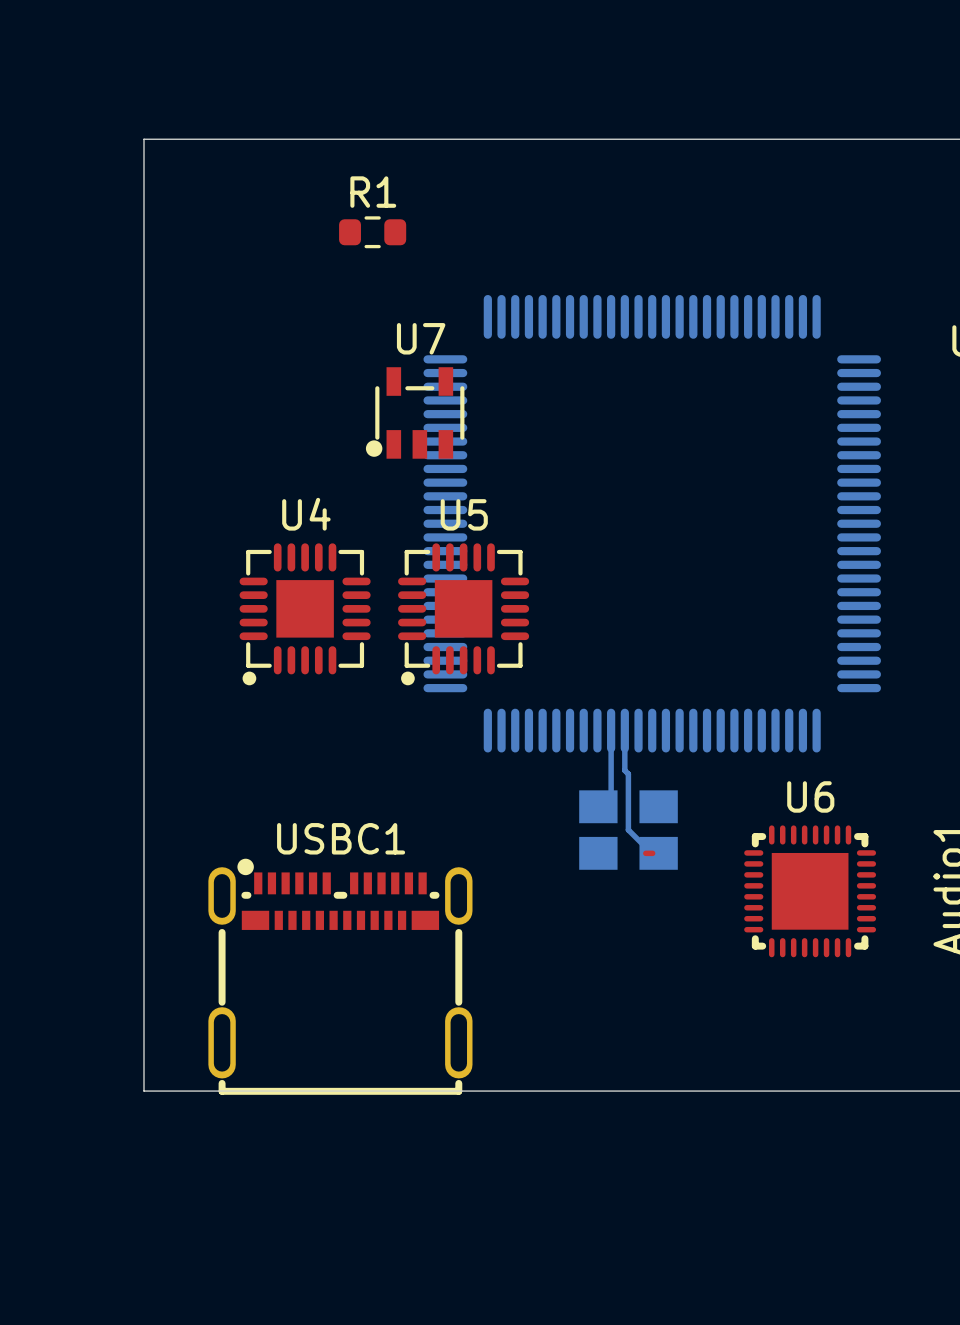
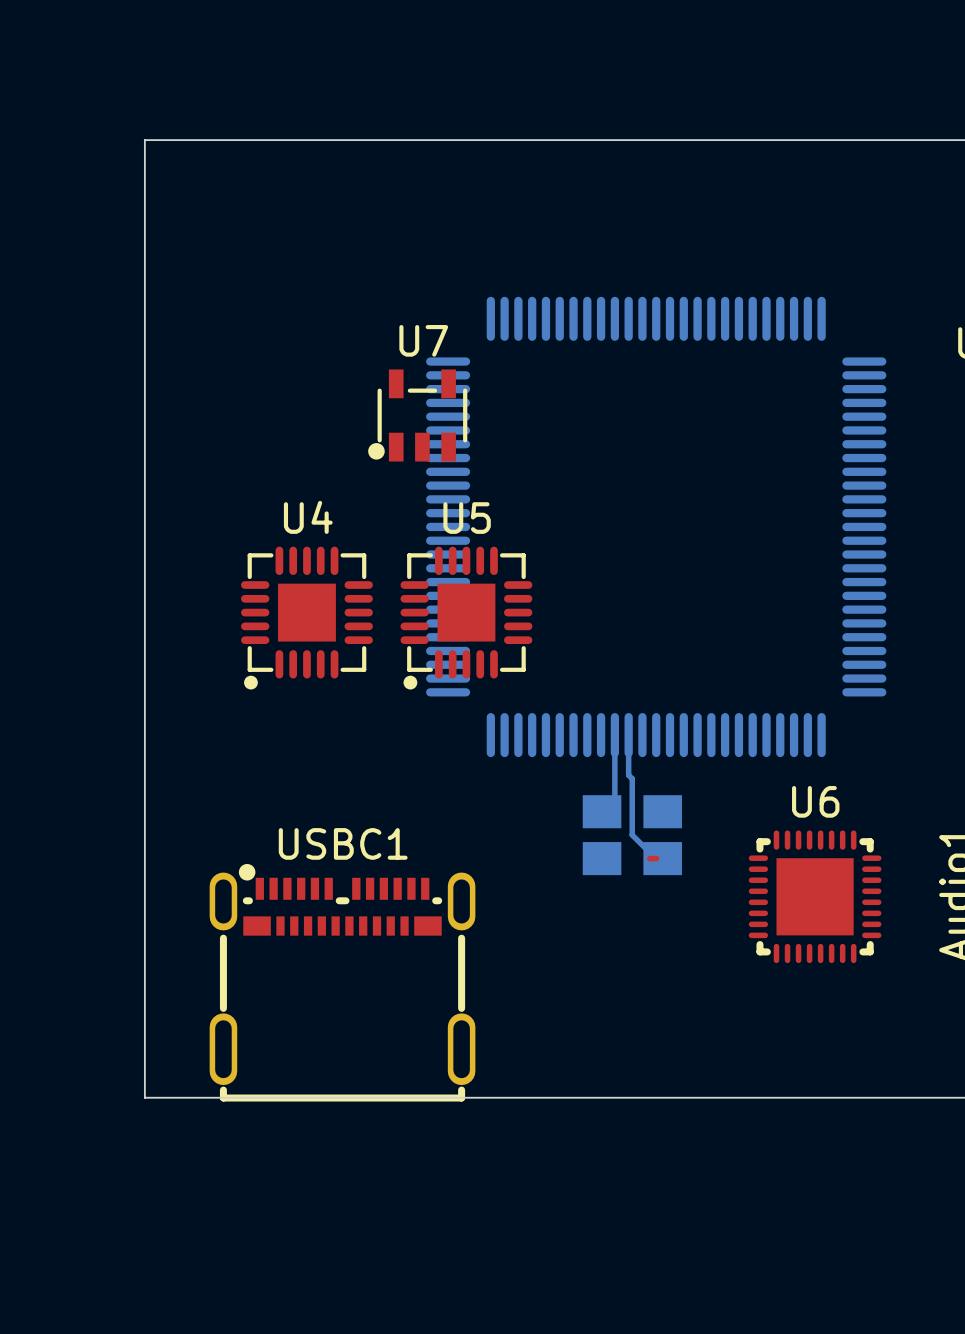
R1: (372, 232) -> none

